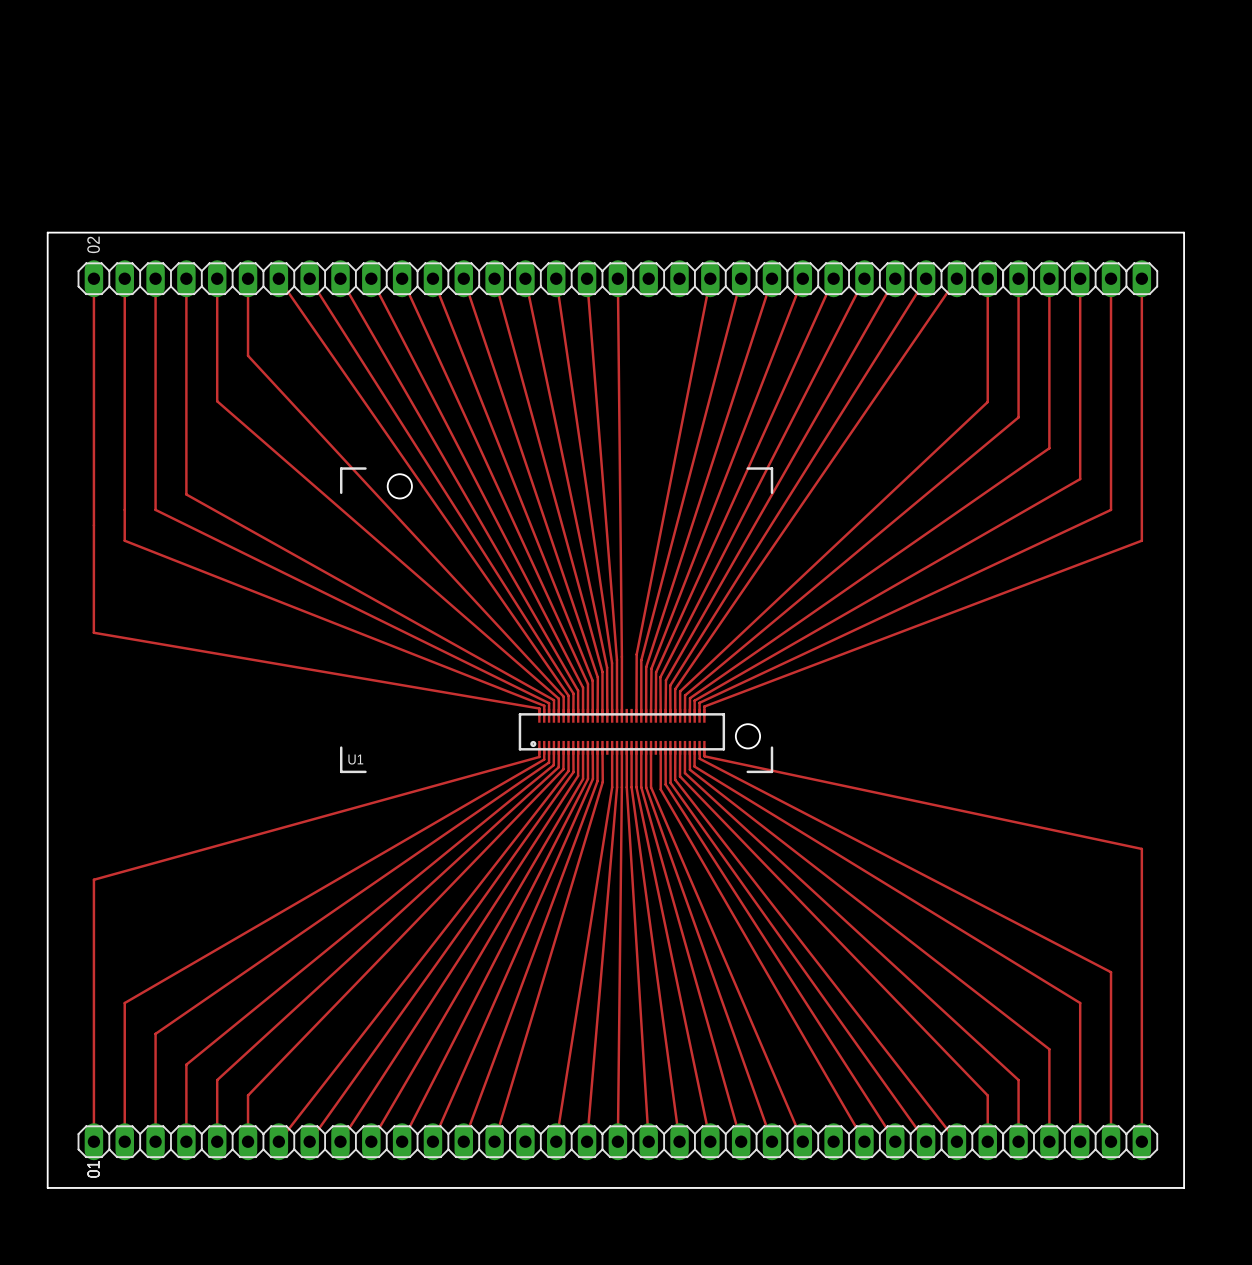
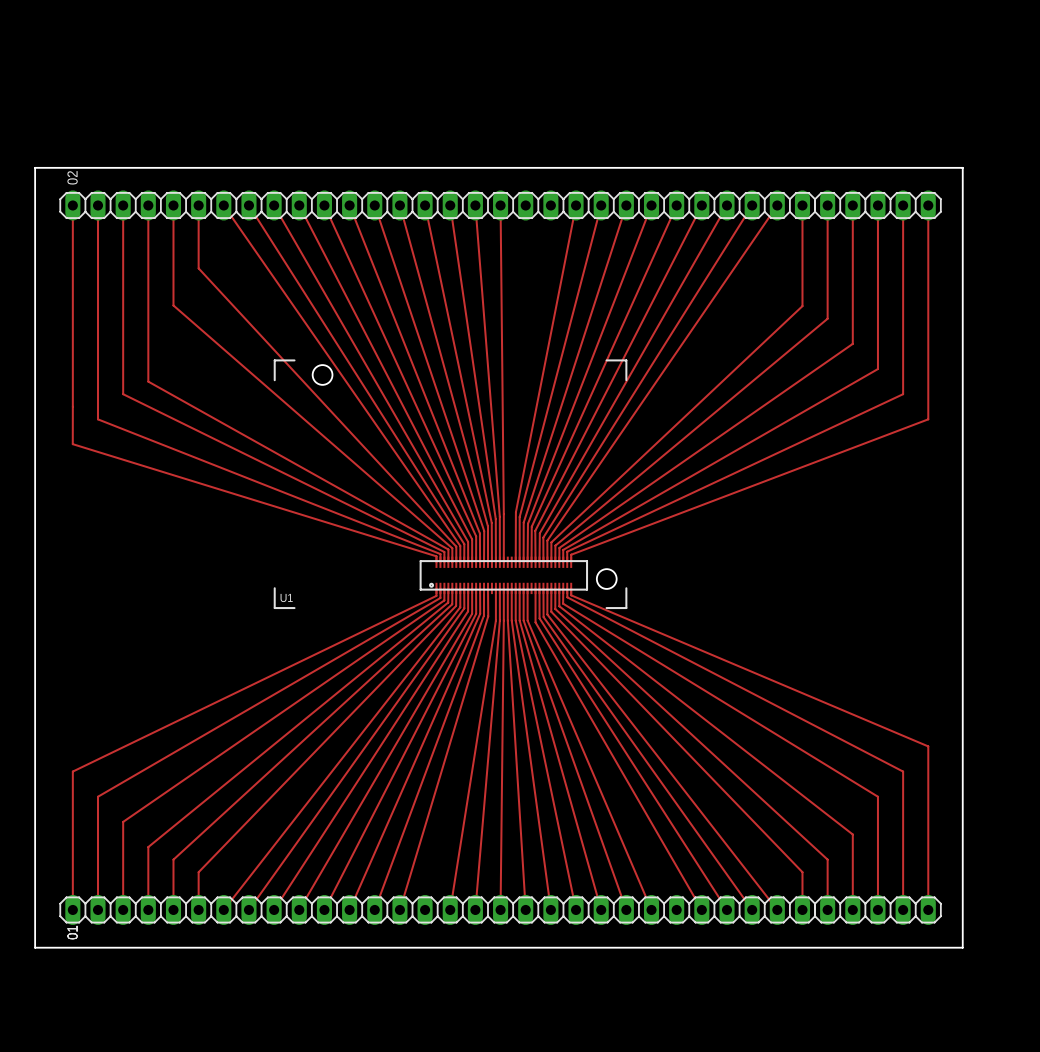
track: (93, 525) (93, 632) (539, 708) -> (72, 406) (72, 444) (436, 556)
track: (539, 756) (93, 879) (93, 972) -> (436, 595) (72, 771)
track: (704, 756) (1141, 848) (1141, 941) -> (571, 595) (928, 746)

